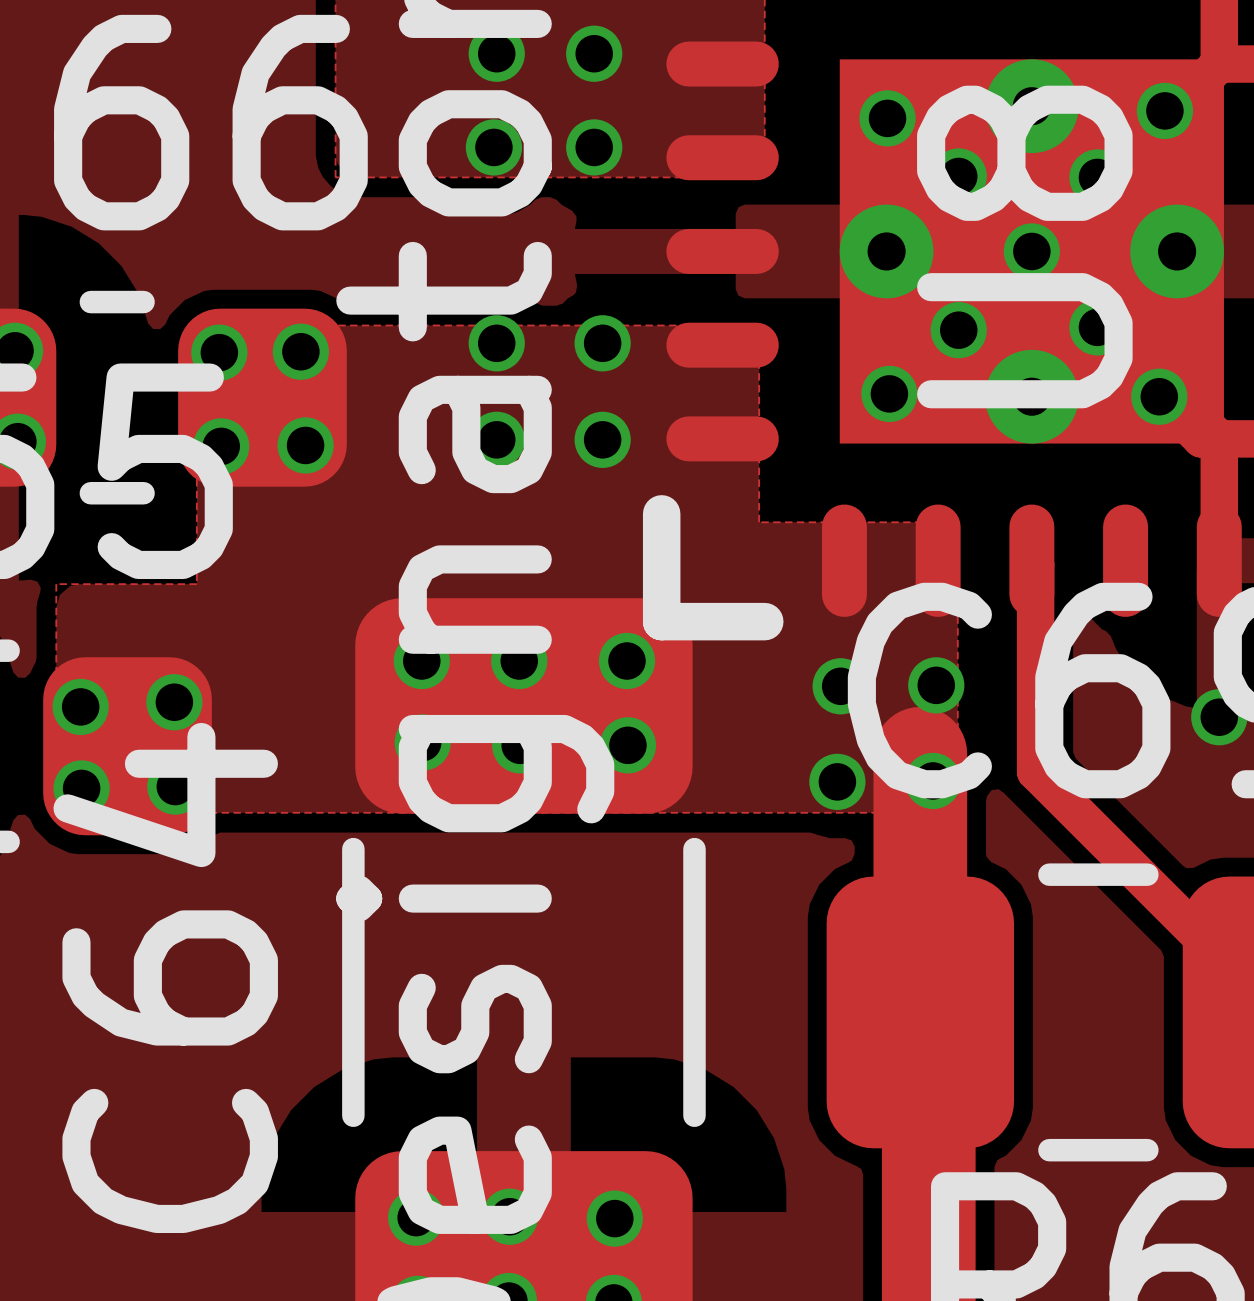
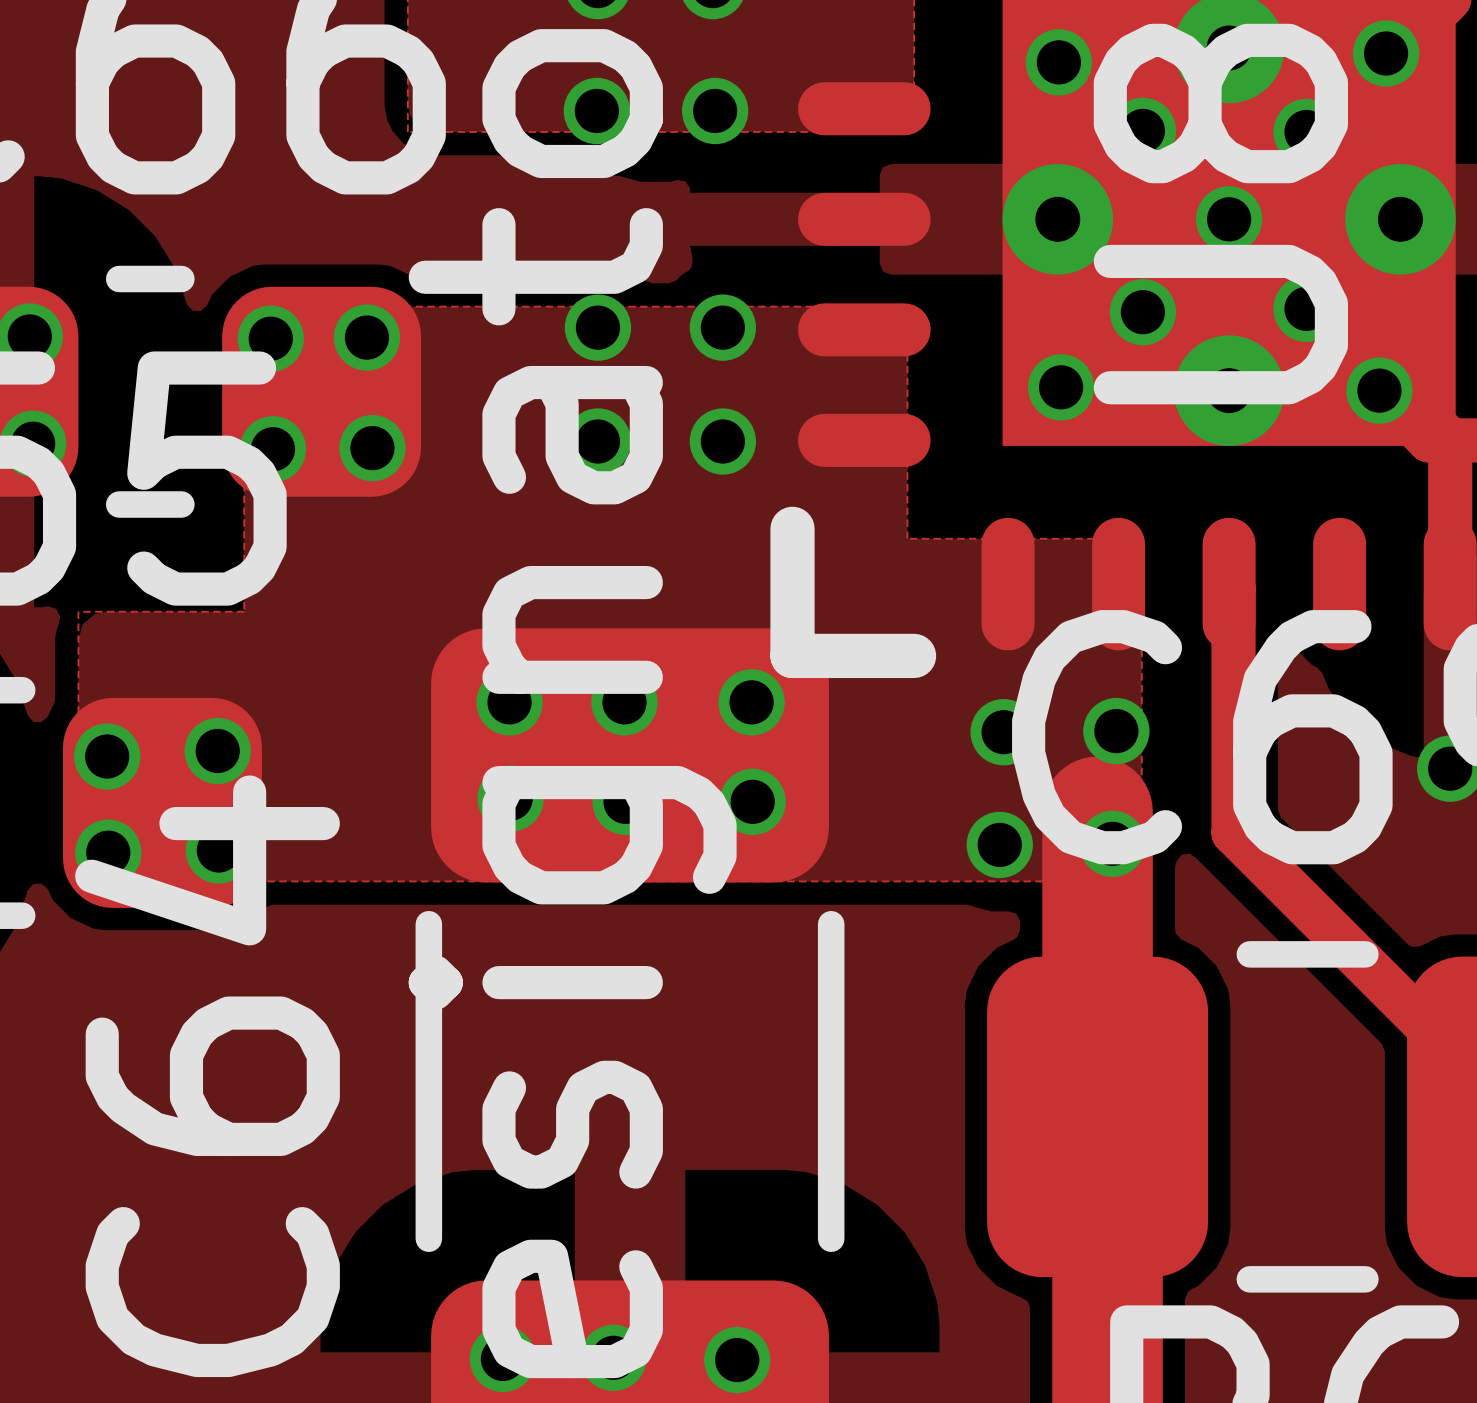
via position: (493, 147) -> (596, 110)
via position: (594, 147) -> (715, 110)

